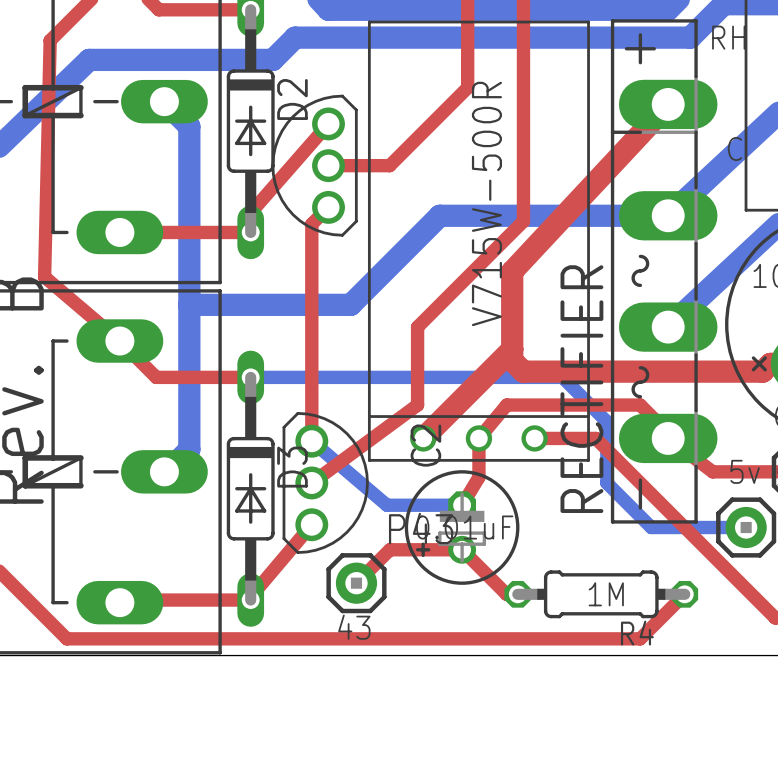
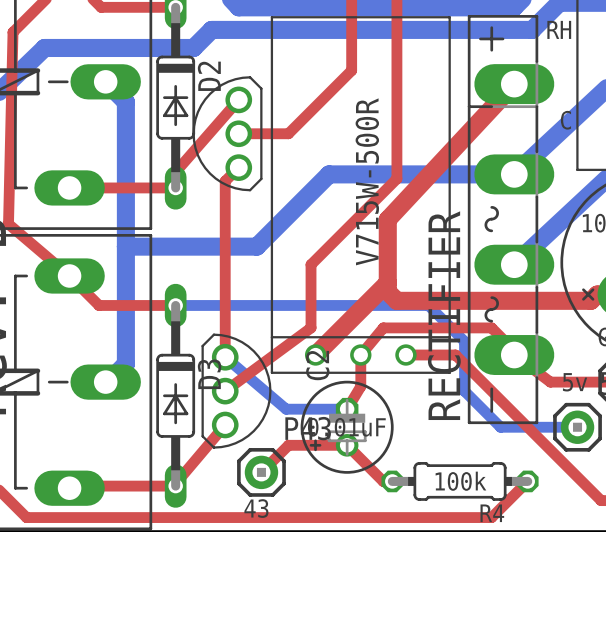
text: 1M (606, 594) -> 100k (460, 481)

